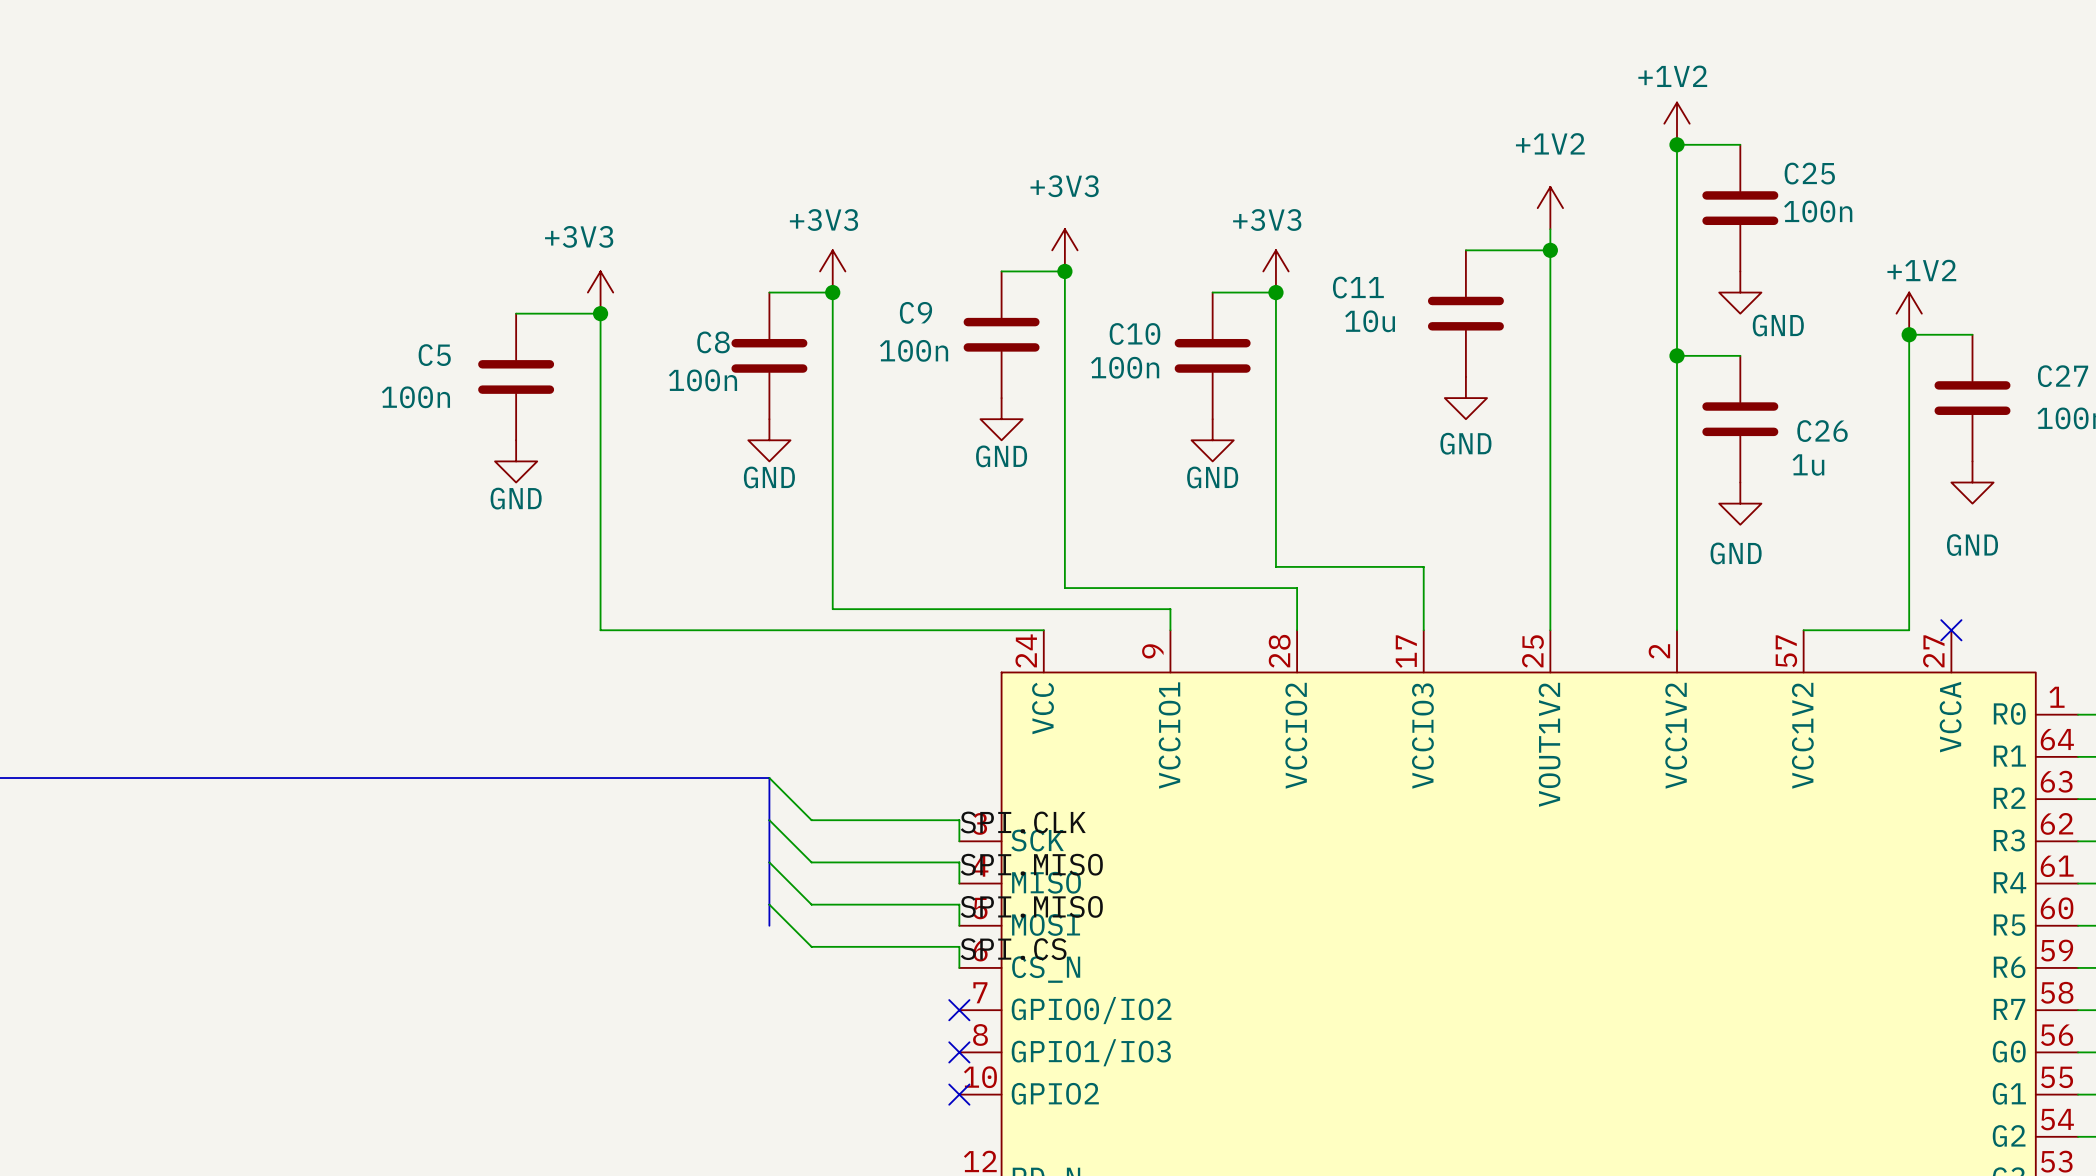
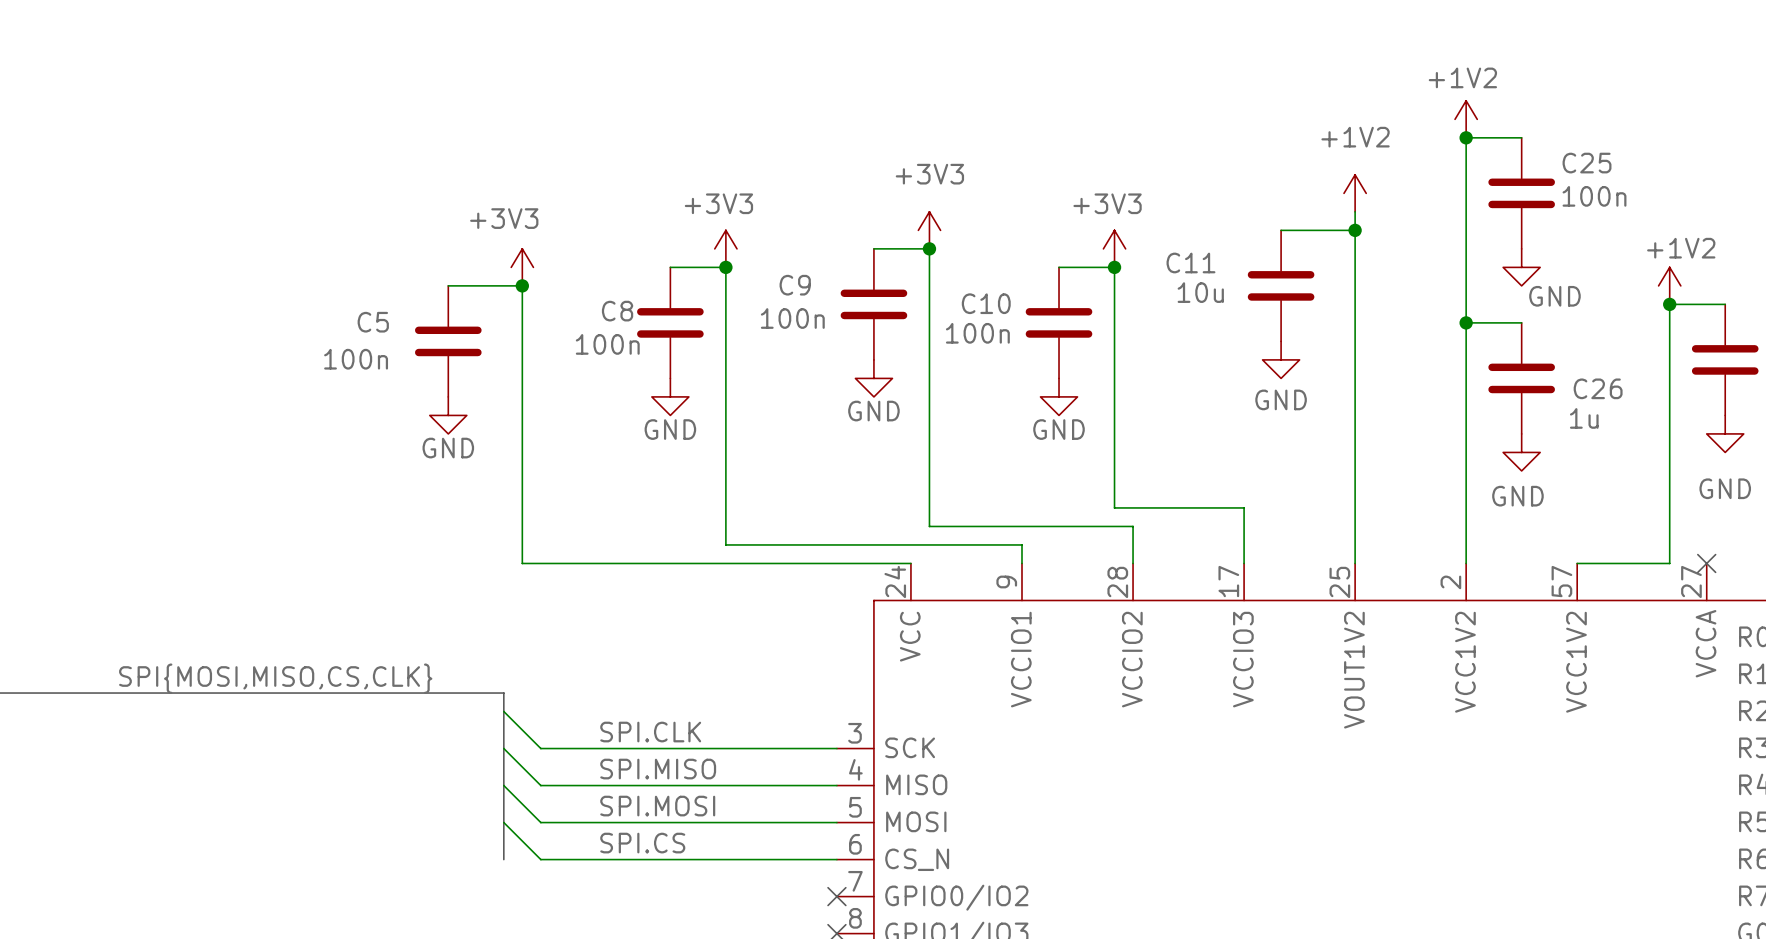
label: none -> SPI{MOSI,MISO,CS,CLK} (275, 678)
bus: (579, 778) (769, 778) (769, 925) -> (503, 693) (503, 859)
wire: (769, 778) (811, 820) (959, 820) (959, 841) -> (503, 711) (540, 748) (836, 748)
wire: (769, 820) (811, 862) (959, 862) (959, 883) -> (503, 748) (540, 785) (836, 785)
label position: SPI.CLK (1023, 822) -> SPI.CLK (650, 732)
wire: (769, 862) (811, 904) (959, 904) (959, 925) -> (503, 785) (540, 822) (836, 822)
label: none -> SPI.MISO (658, 769)
label: SPI.MISO (1031, 864) -> none
wire: (769, 904) (811, 946) (959, 946) (959, 967) -> (503, 822) (540, 859) (836, 859)
label: none -> SPI.MOSI (657, 806)
label: SPI.MISO (1031, 906) -> none
label position: SPI.CS (1013, 949) -> SPI.CS (642, 843)

